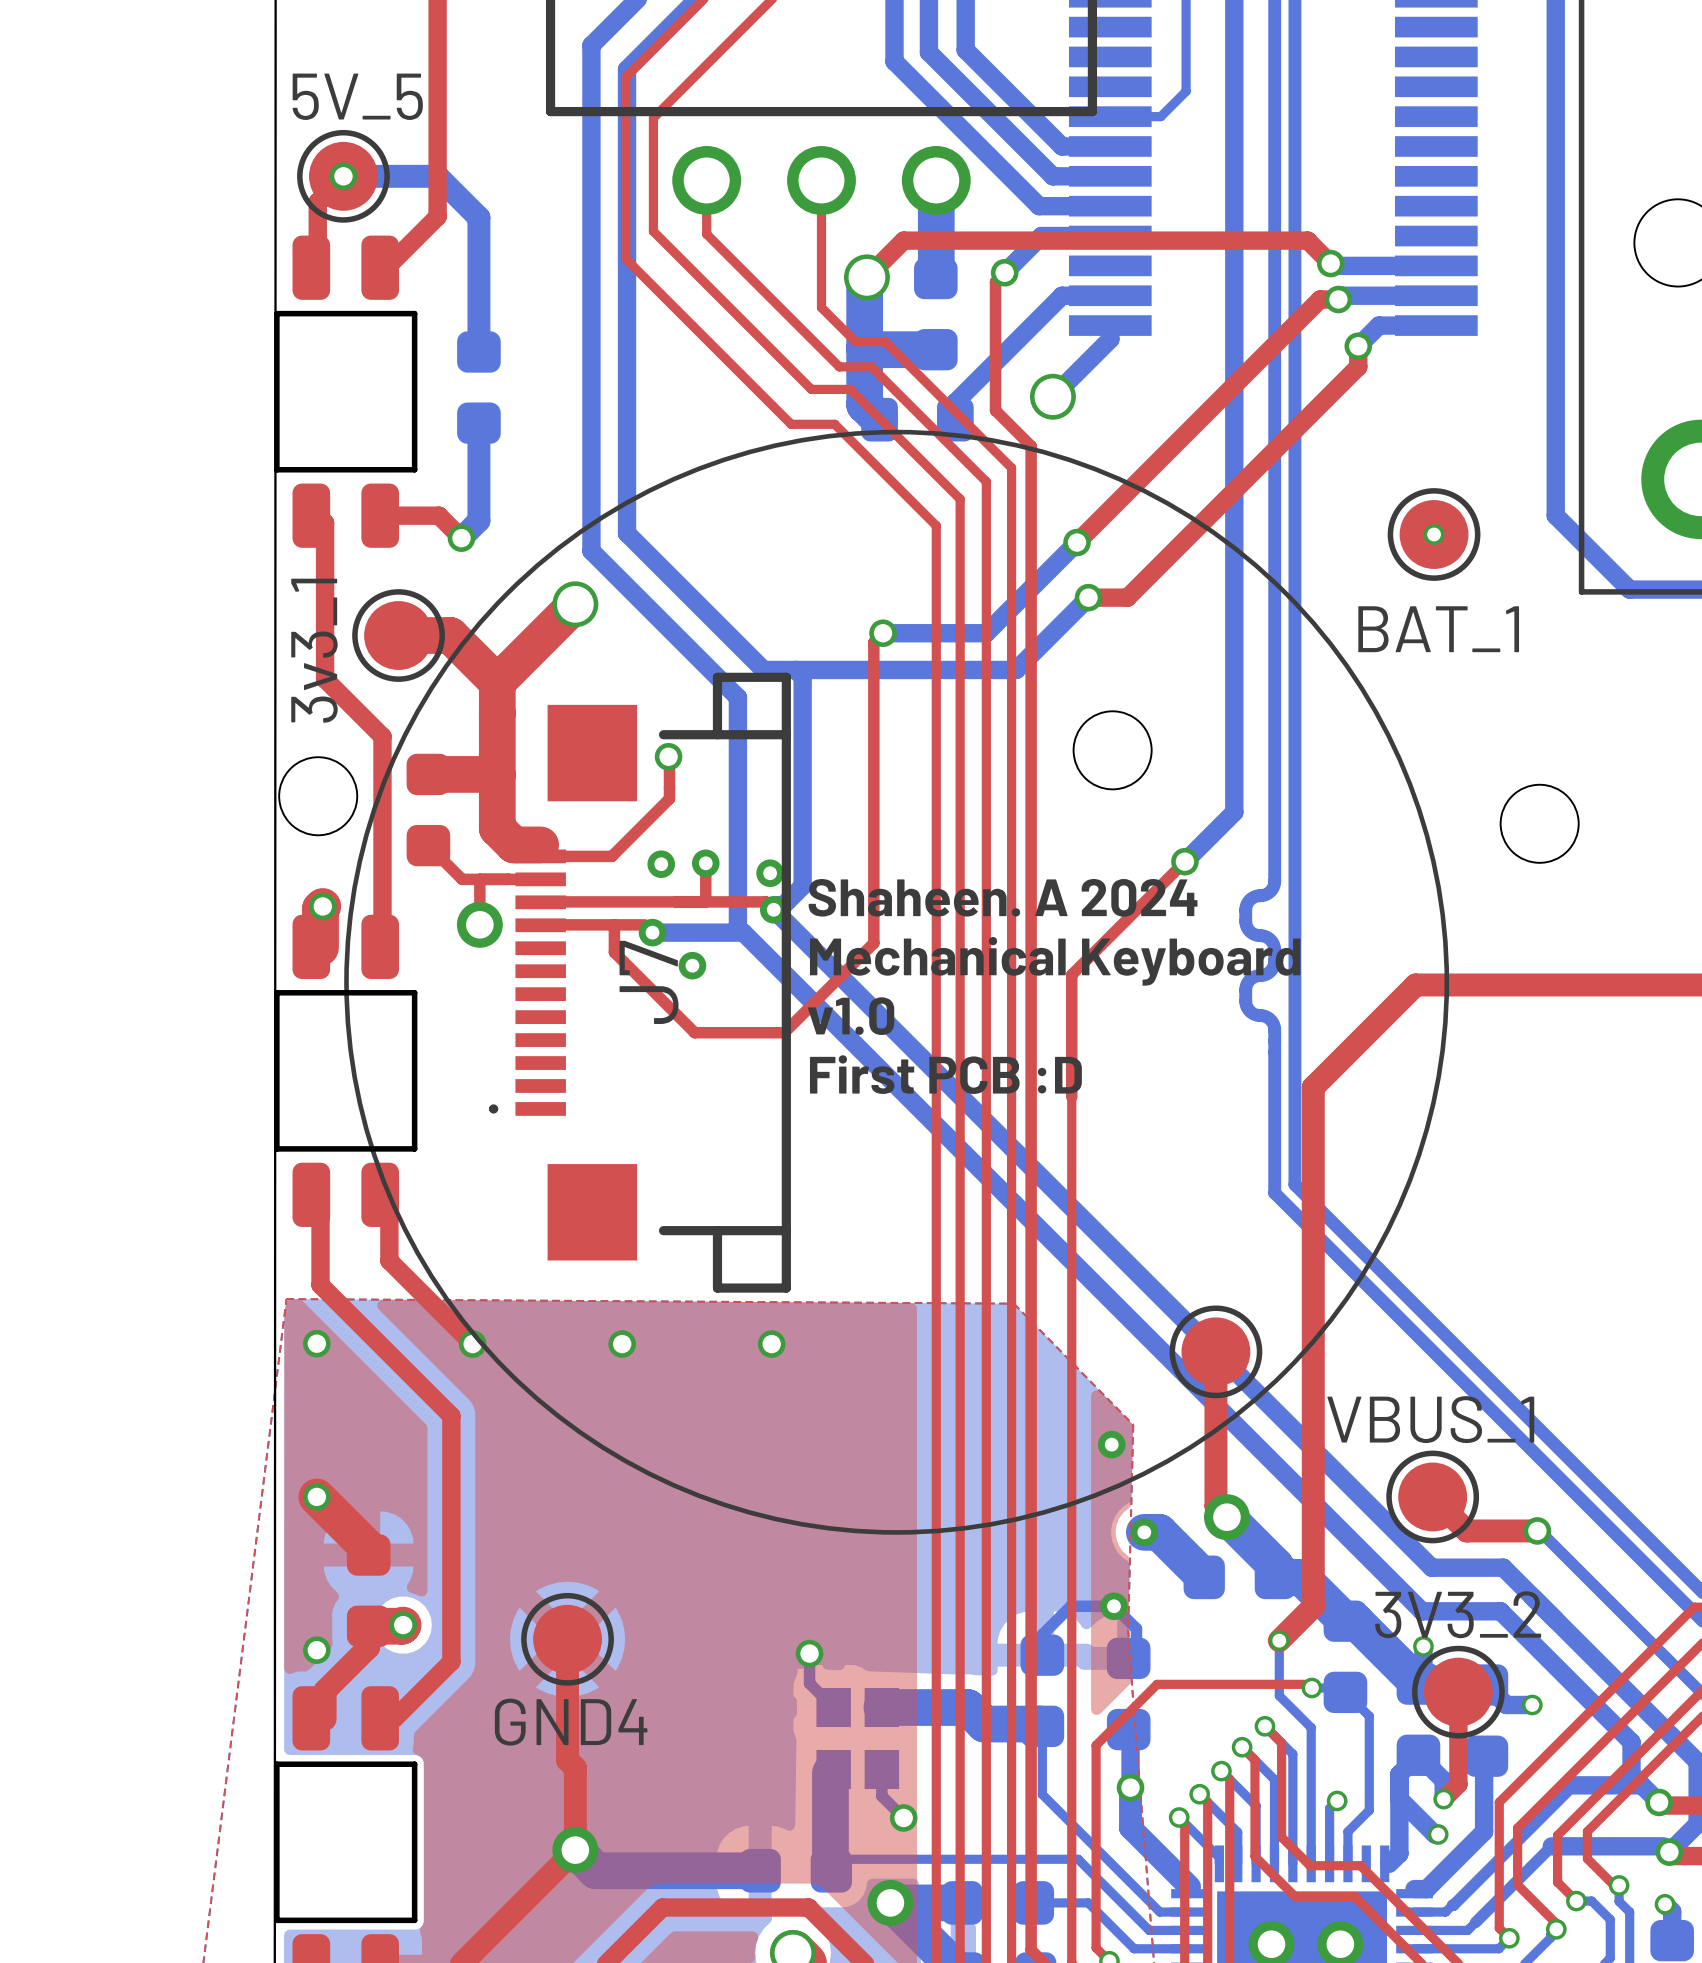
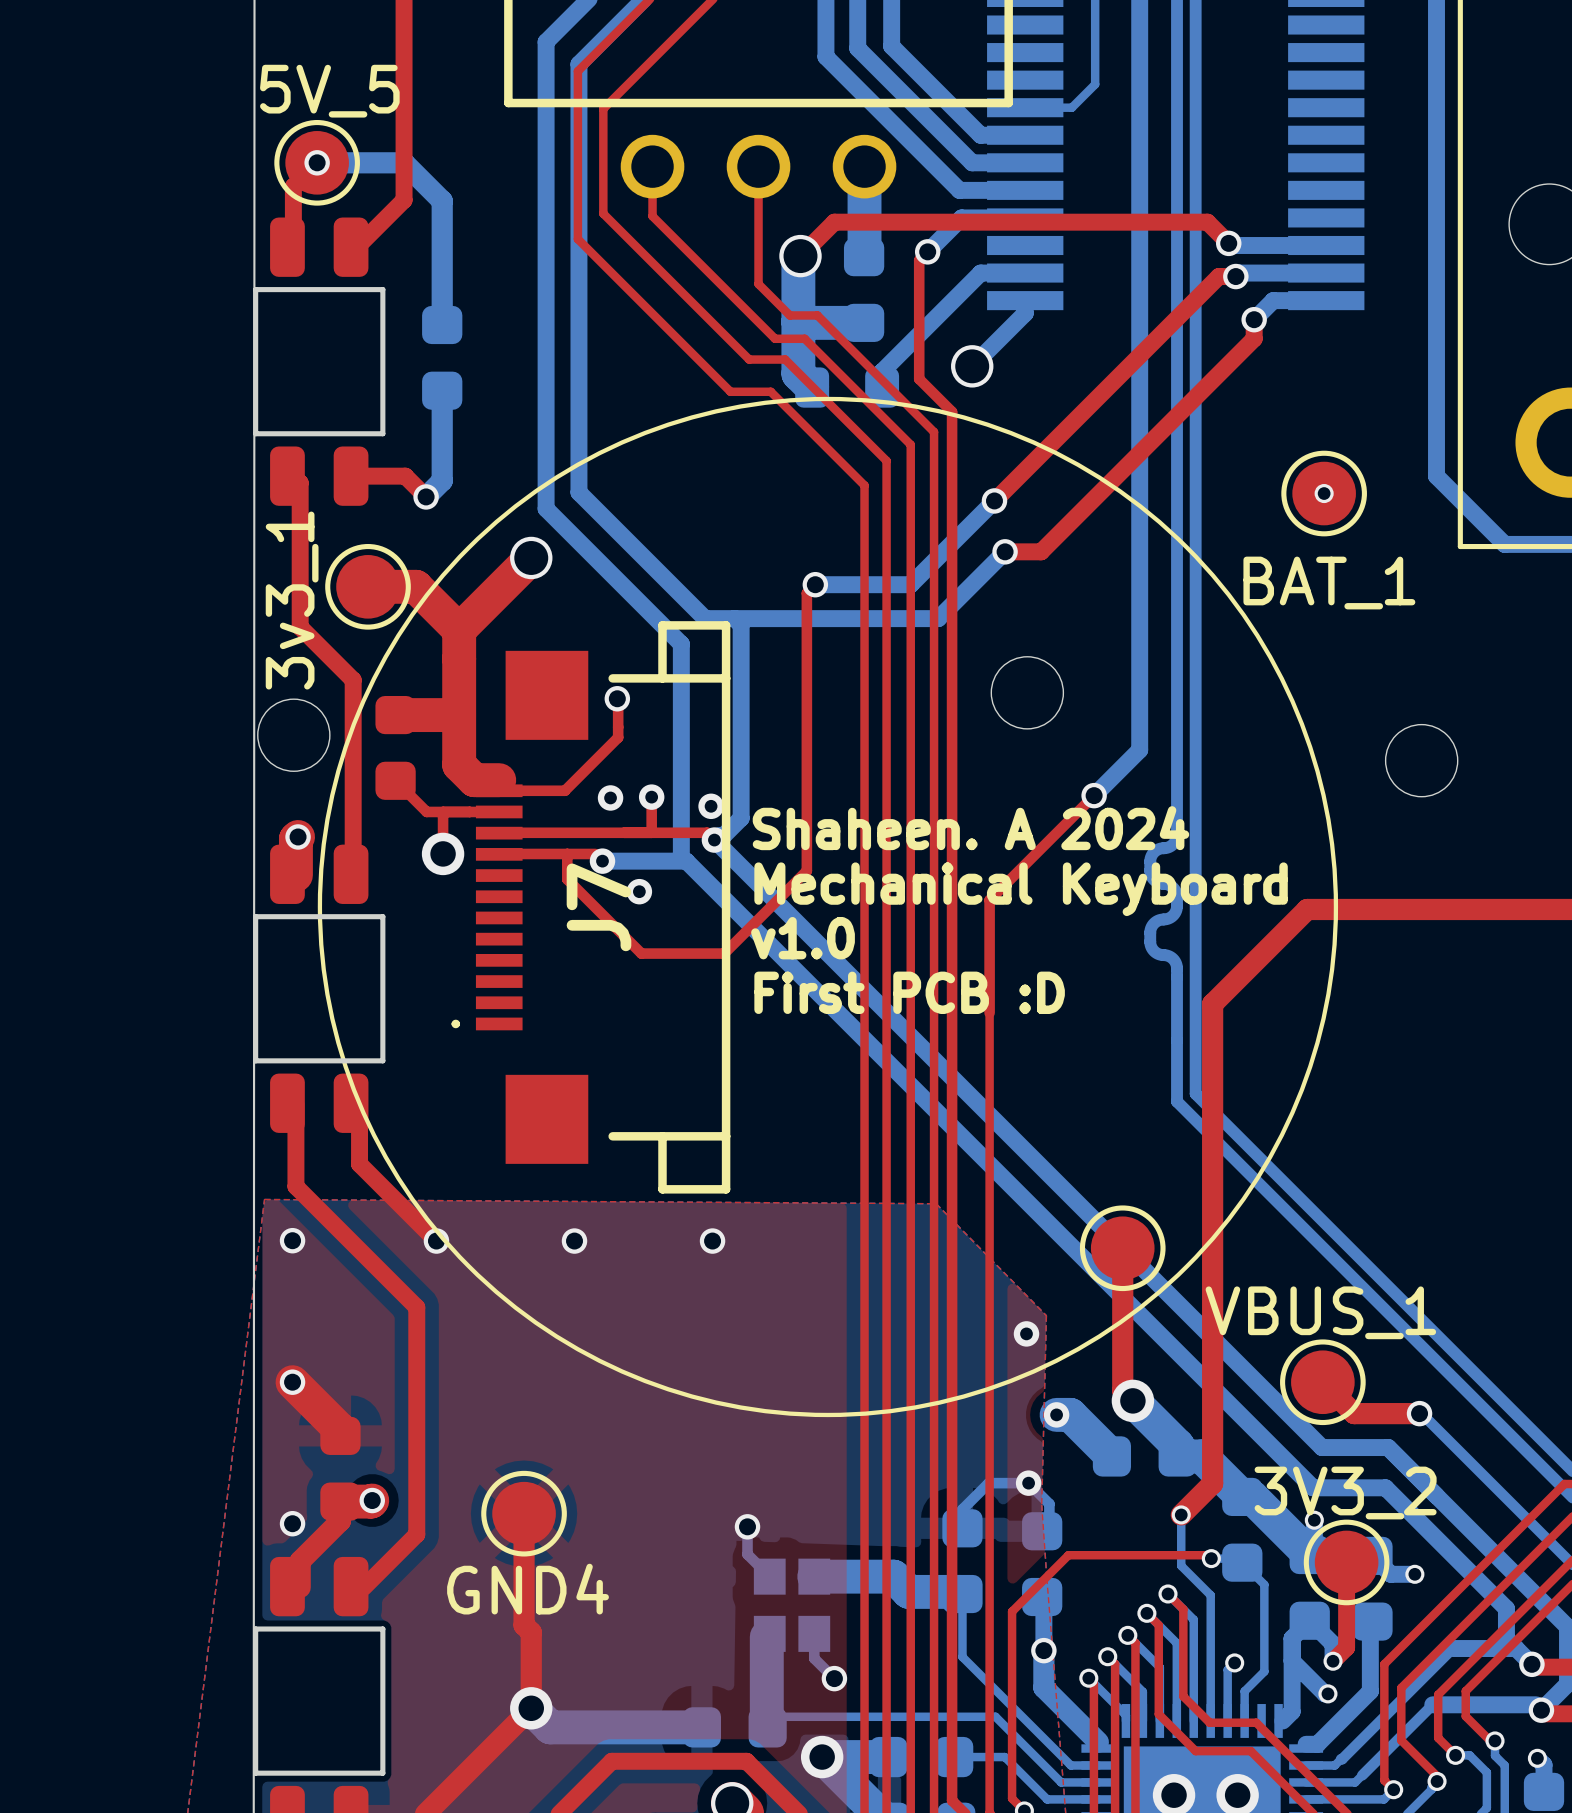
bottom track: (1274, 881) (1269, 892) (1249, 899) (1245, 910) (1245, 922) (1248, 930) (1255, 934) (1267, 937) (1274, 946) (1273, 967) (1267, 973) (1255, 976) (1248, 981) (1245, 988) (1245, 1001) (1251, 1012) (1266, 1016) (1272, 1022) (1274, 1028) (1274, 1048) -> (1177, 813) (1176, 836) (1174, 841) (1169, 846) (1155, 851) (1150, 861) (1150, 871) (1153, 878) (1157, 882) (1171, 886) (1177, 897) (1176, 907) (1174, 914) (1168, 918) (1157, 920) (1152, 925) (1150, 944) (1156, 953) (1173, 959) (1177, 968)

